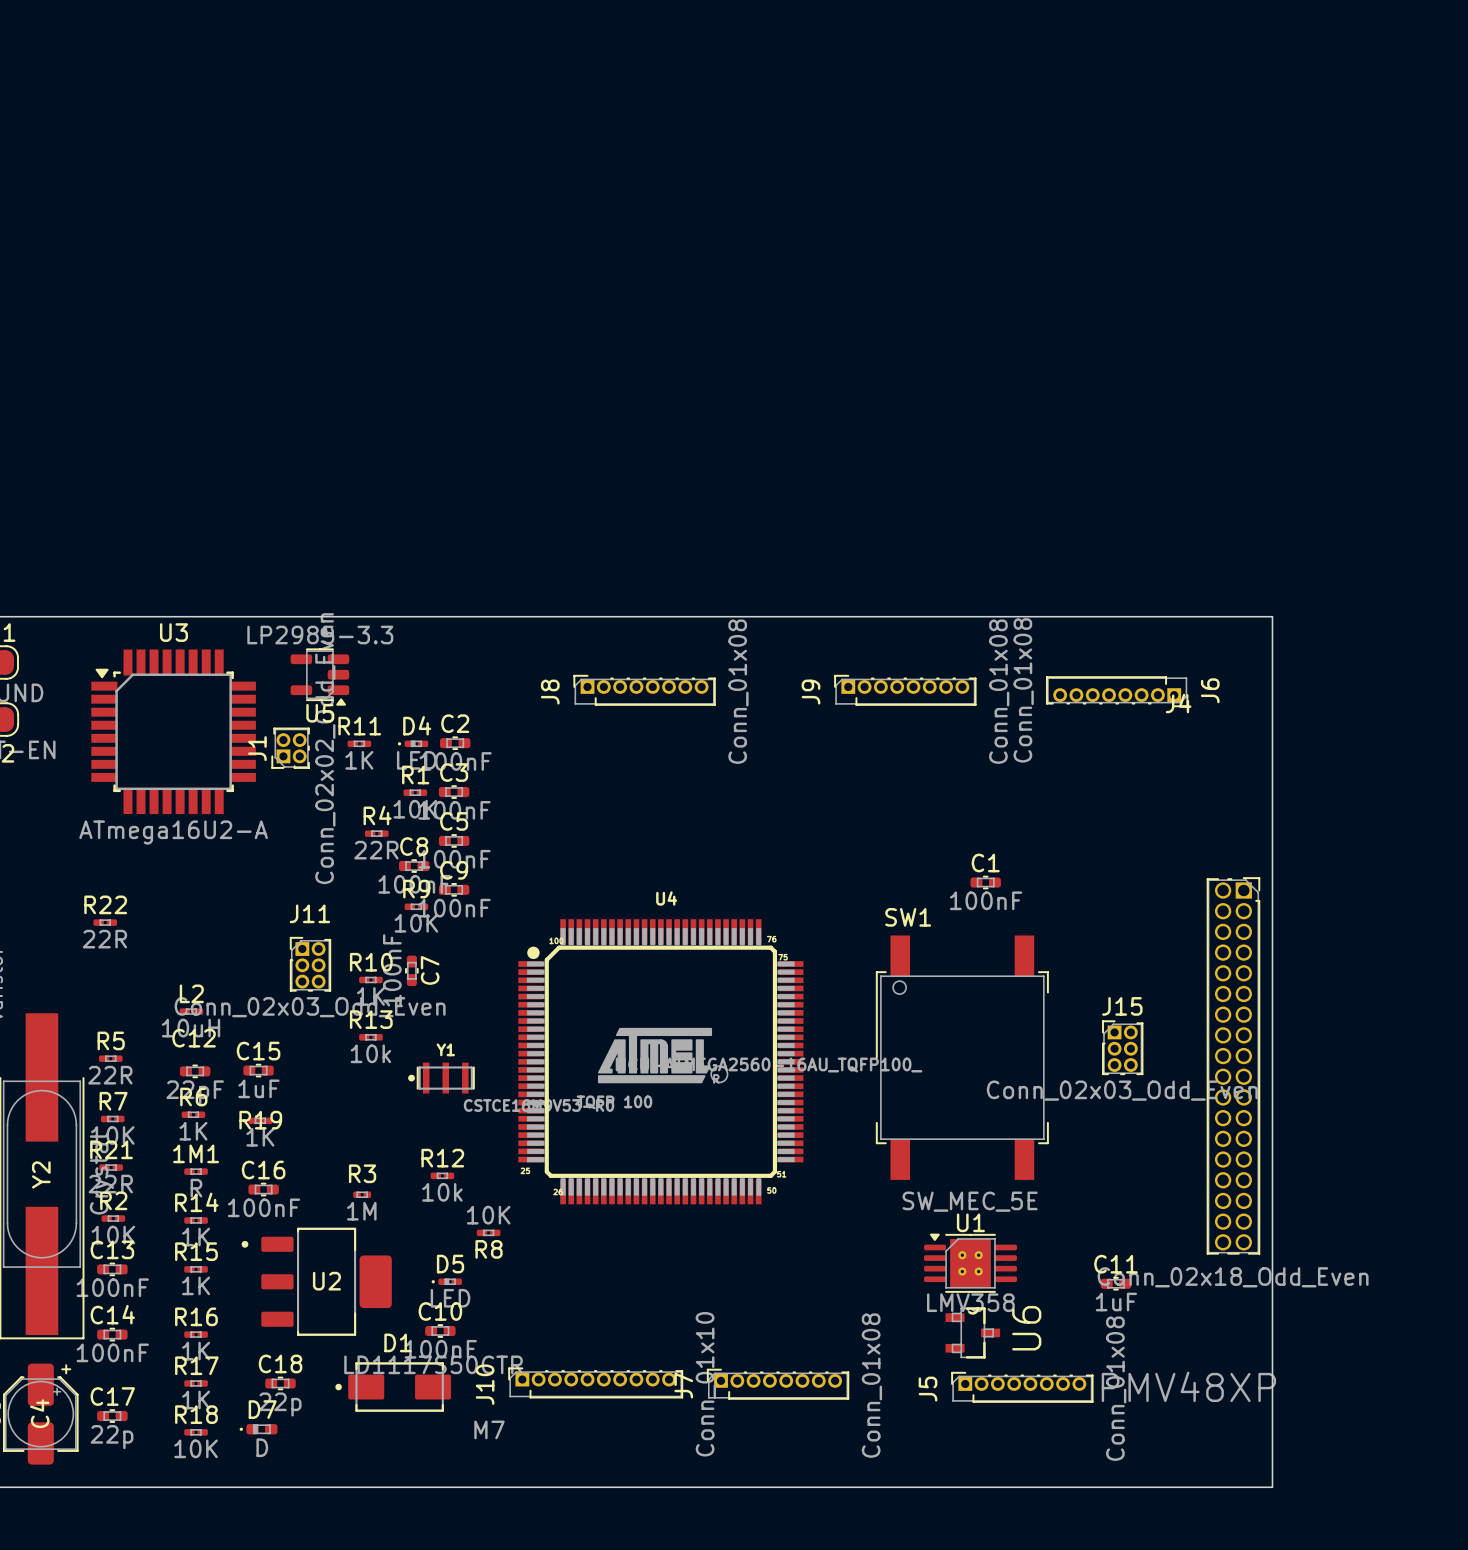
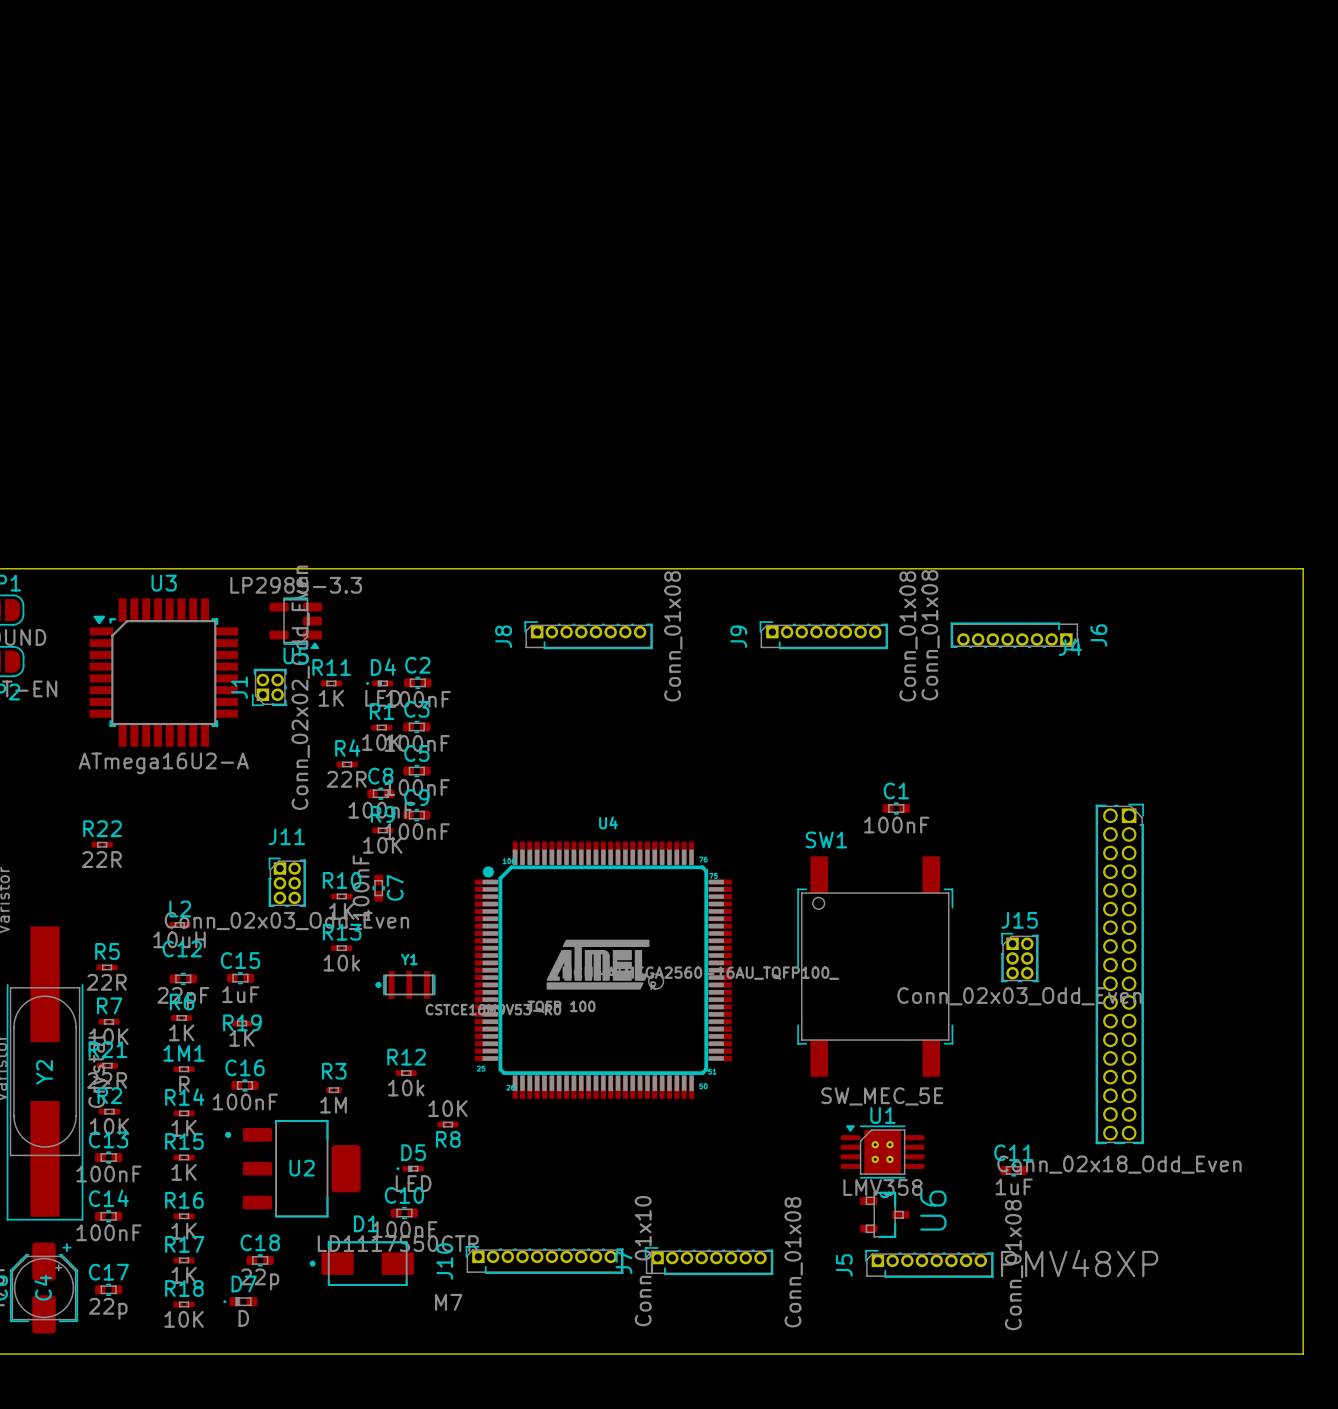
board edge: (1272, 616) (1272, 1487) -> (1155, 568) (1303, 568) (1303, 1354) (1155, 1354)

